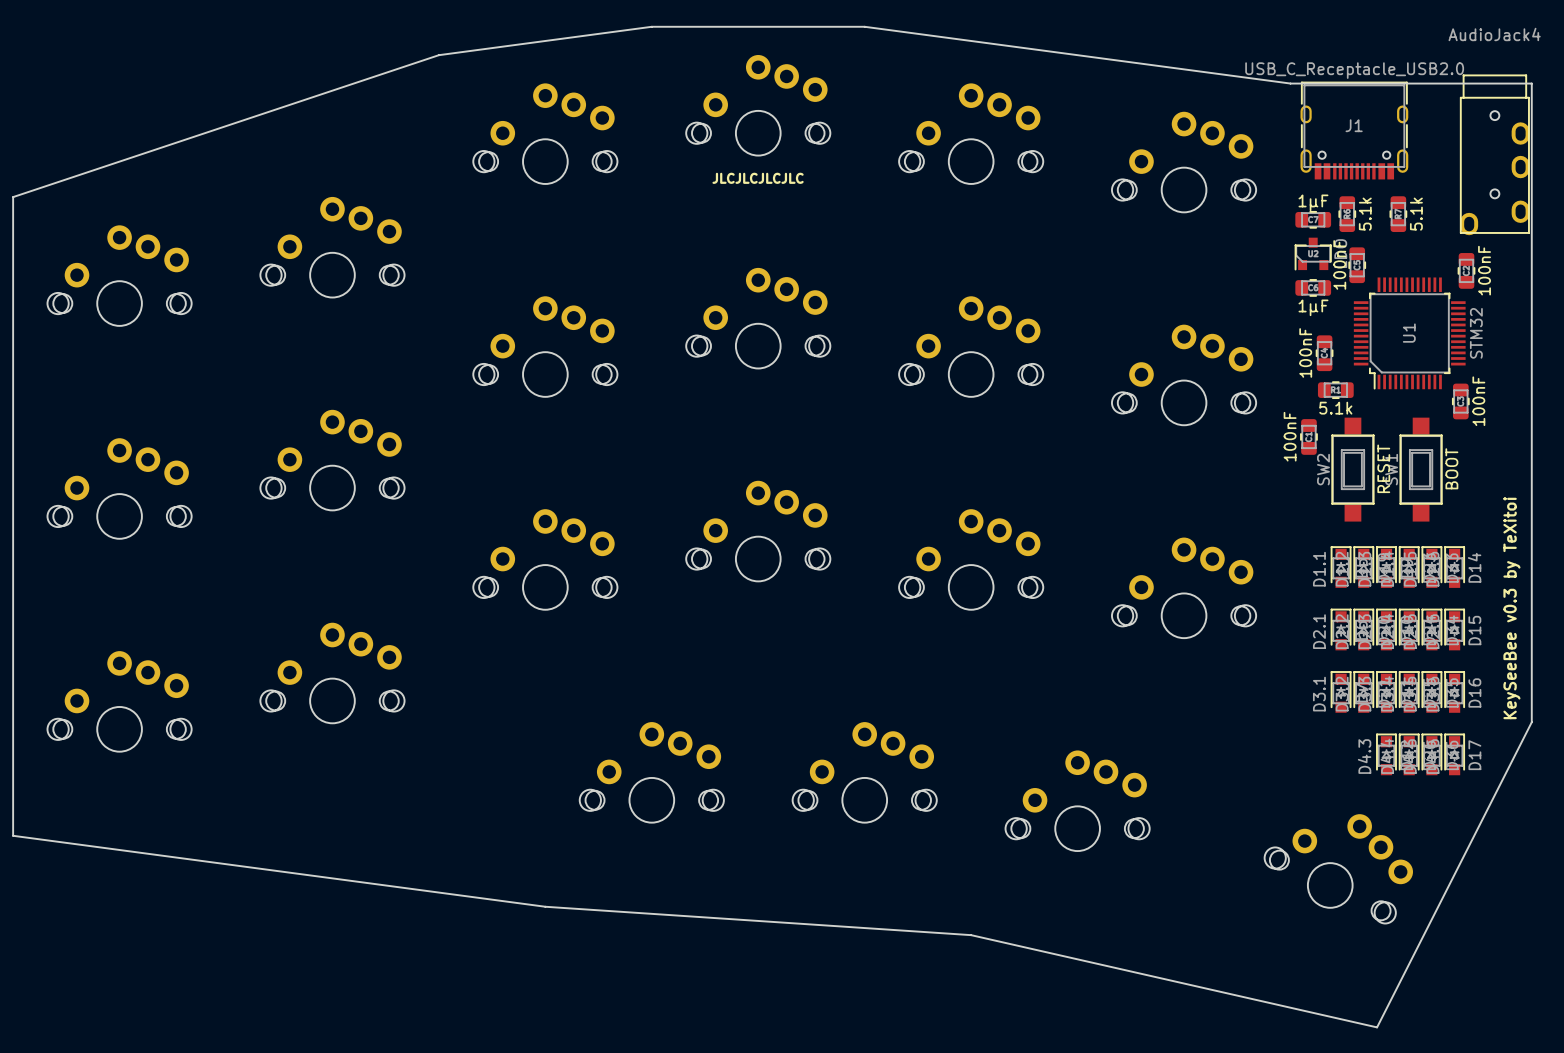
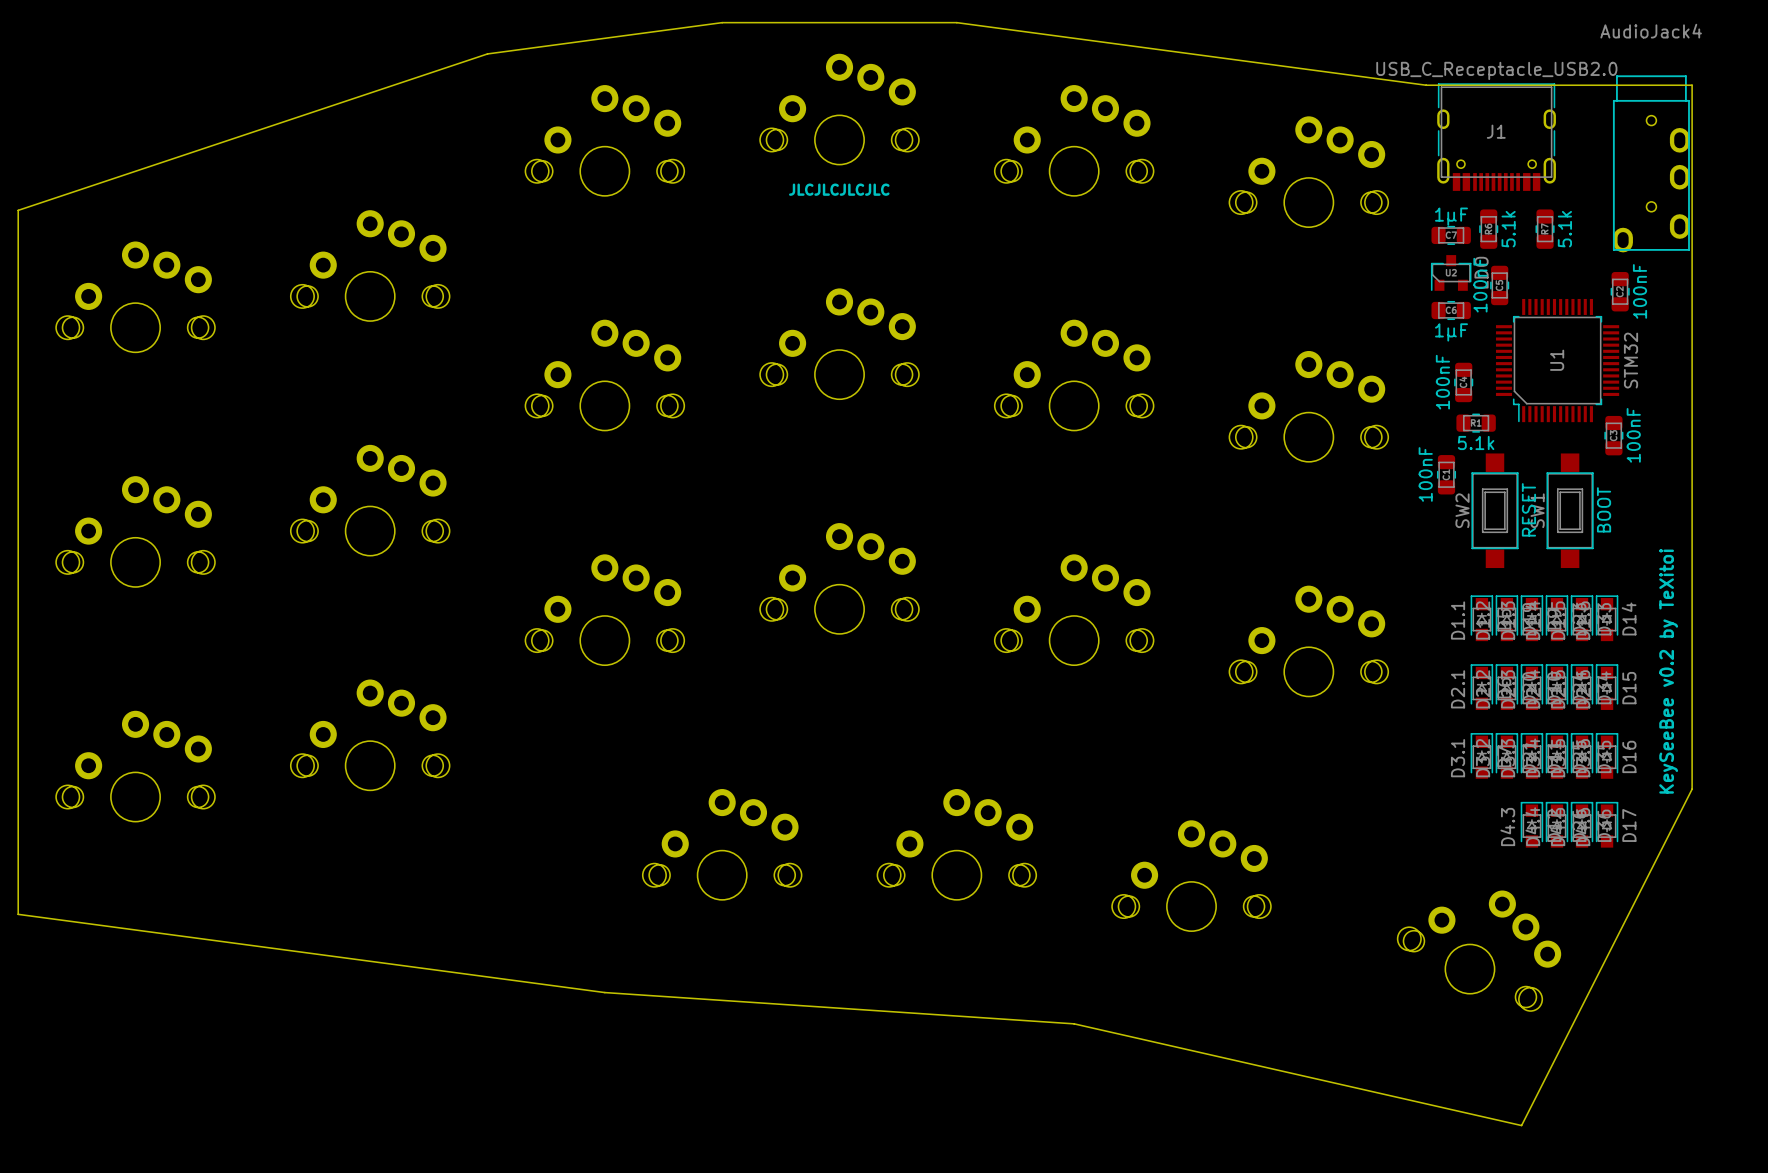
text: KeySeeBee v0.3 by TeXitoi (1511, 608) -> KeySeeBee v0.2 by TeXitoi (1668, 671)

